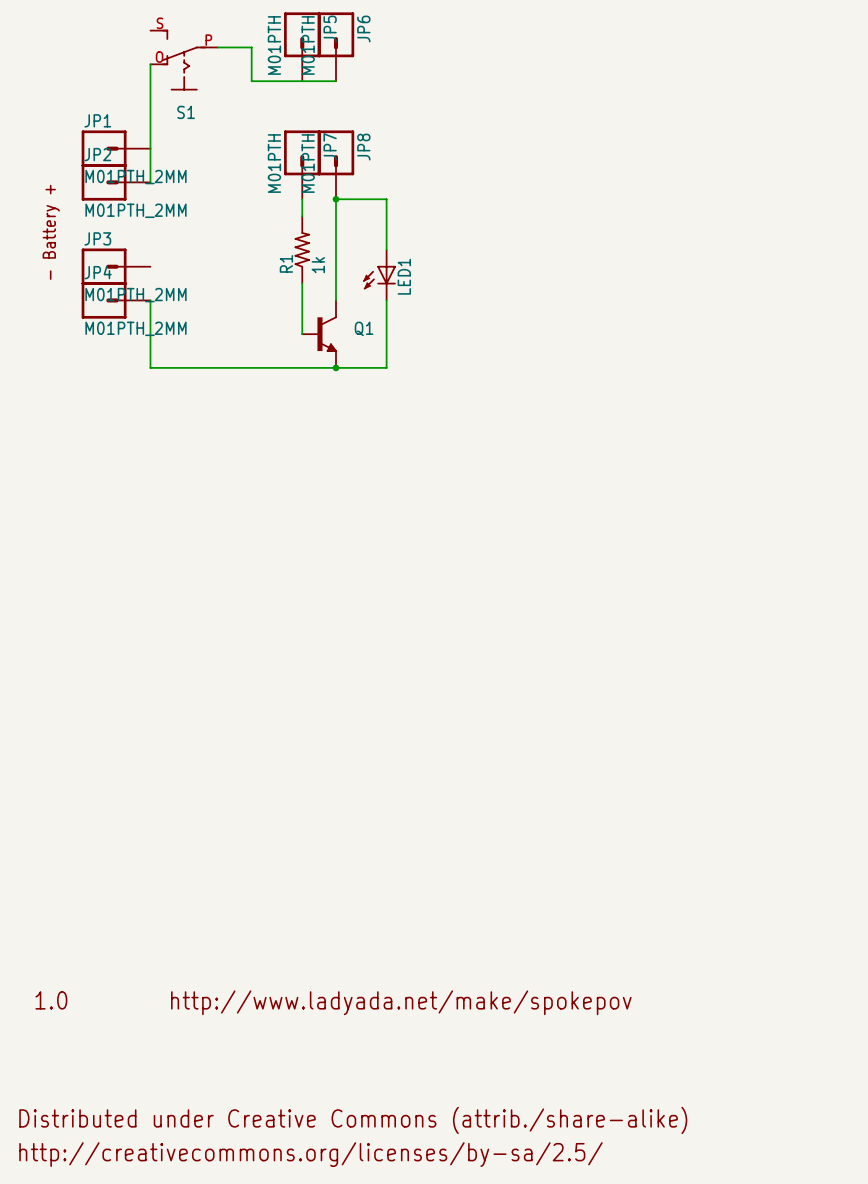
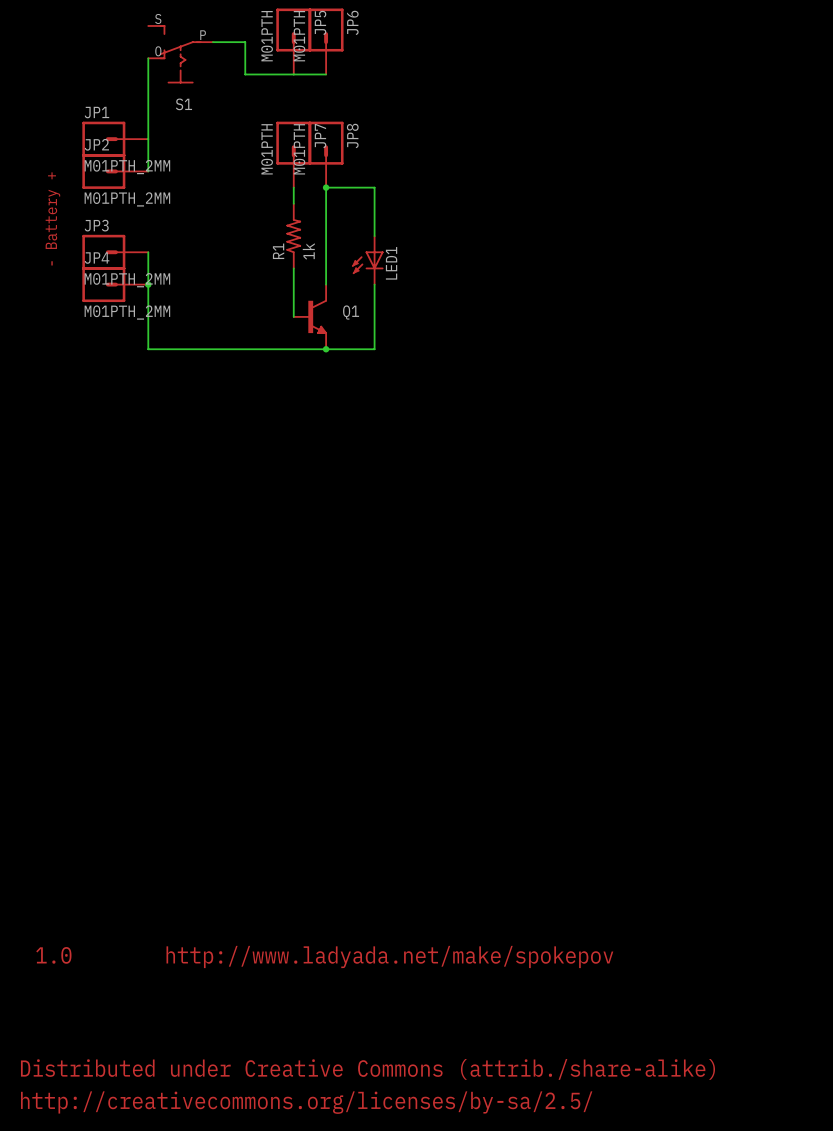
wire: none -> (148, 252) (148, 284)
junction: none -> (148, 284)

